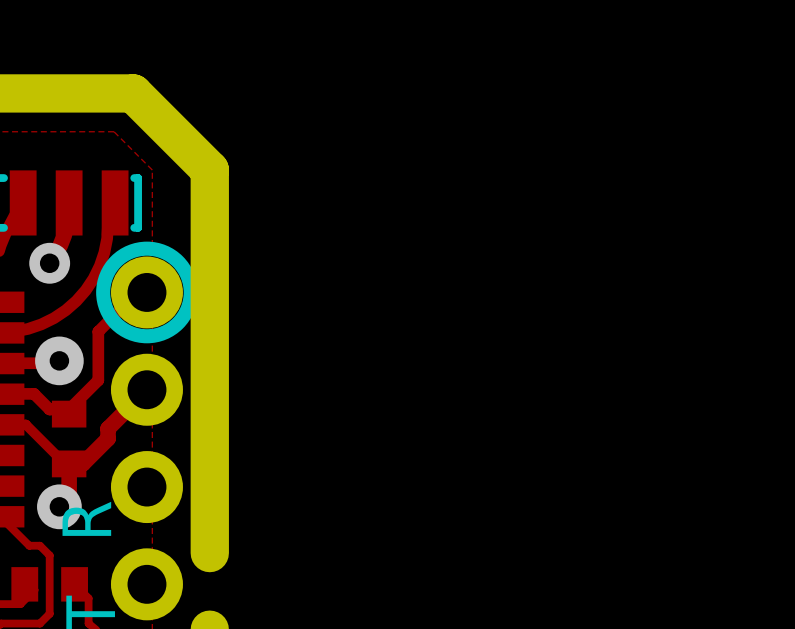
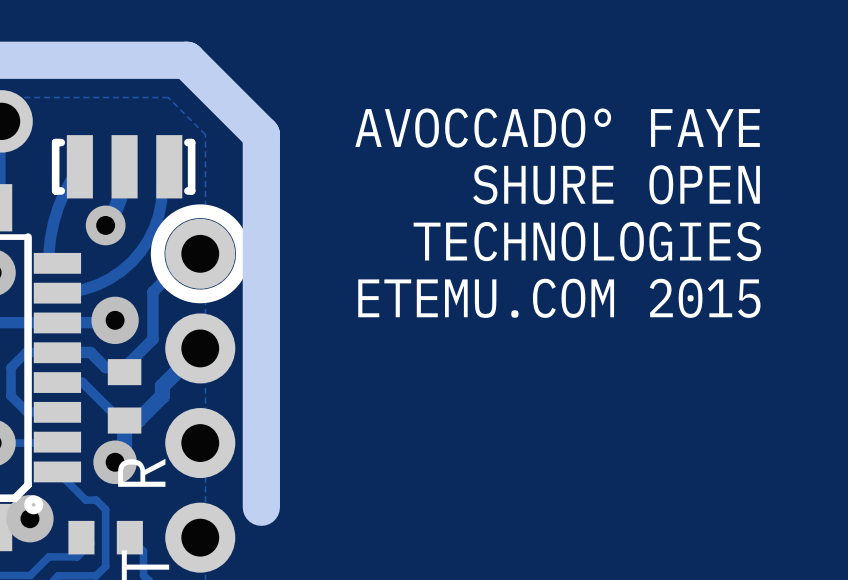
text: none -> AVOCCADO° FAYE (557, 128)
text: none -> SHURE OPEN (616, 184)
text: none -> TECHNOLOGIES (587, 241)
text: none -> ETEMU.COM 2015 (559, 298)

